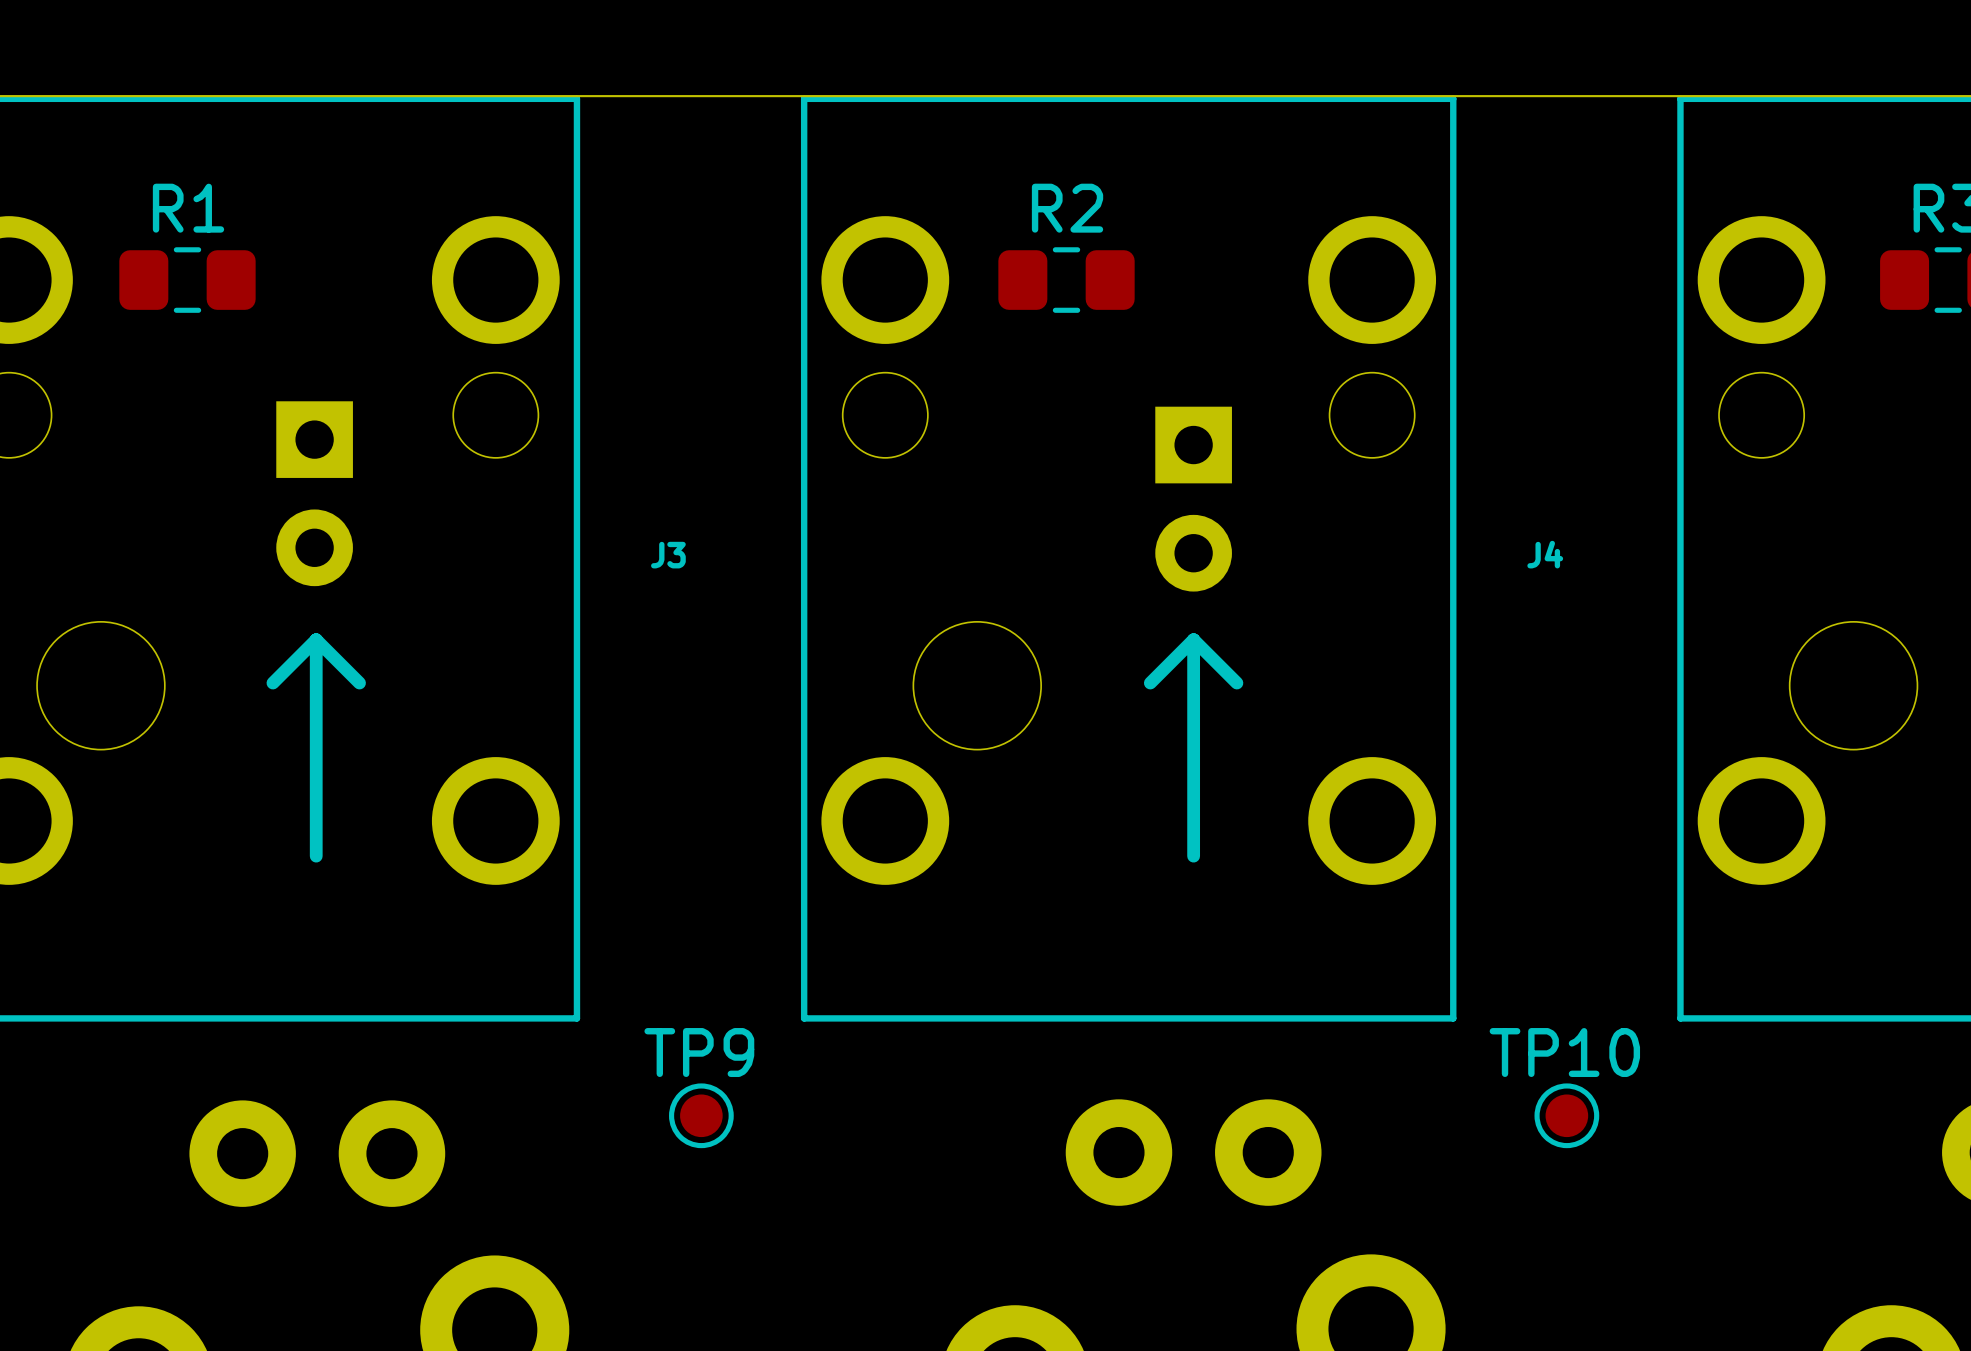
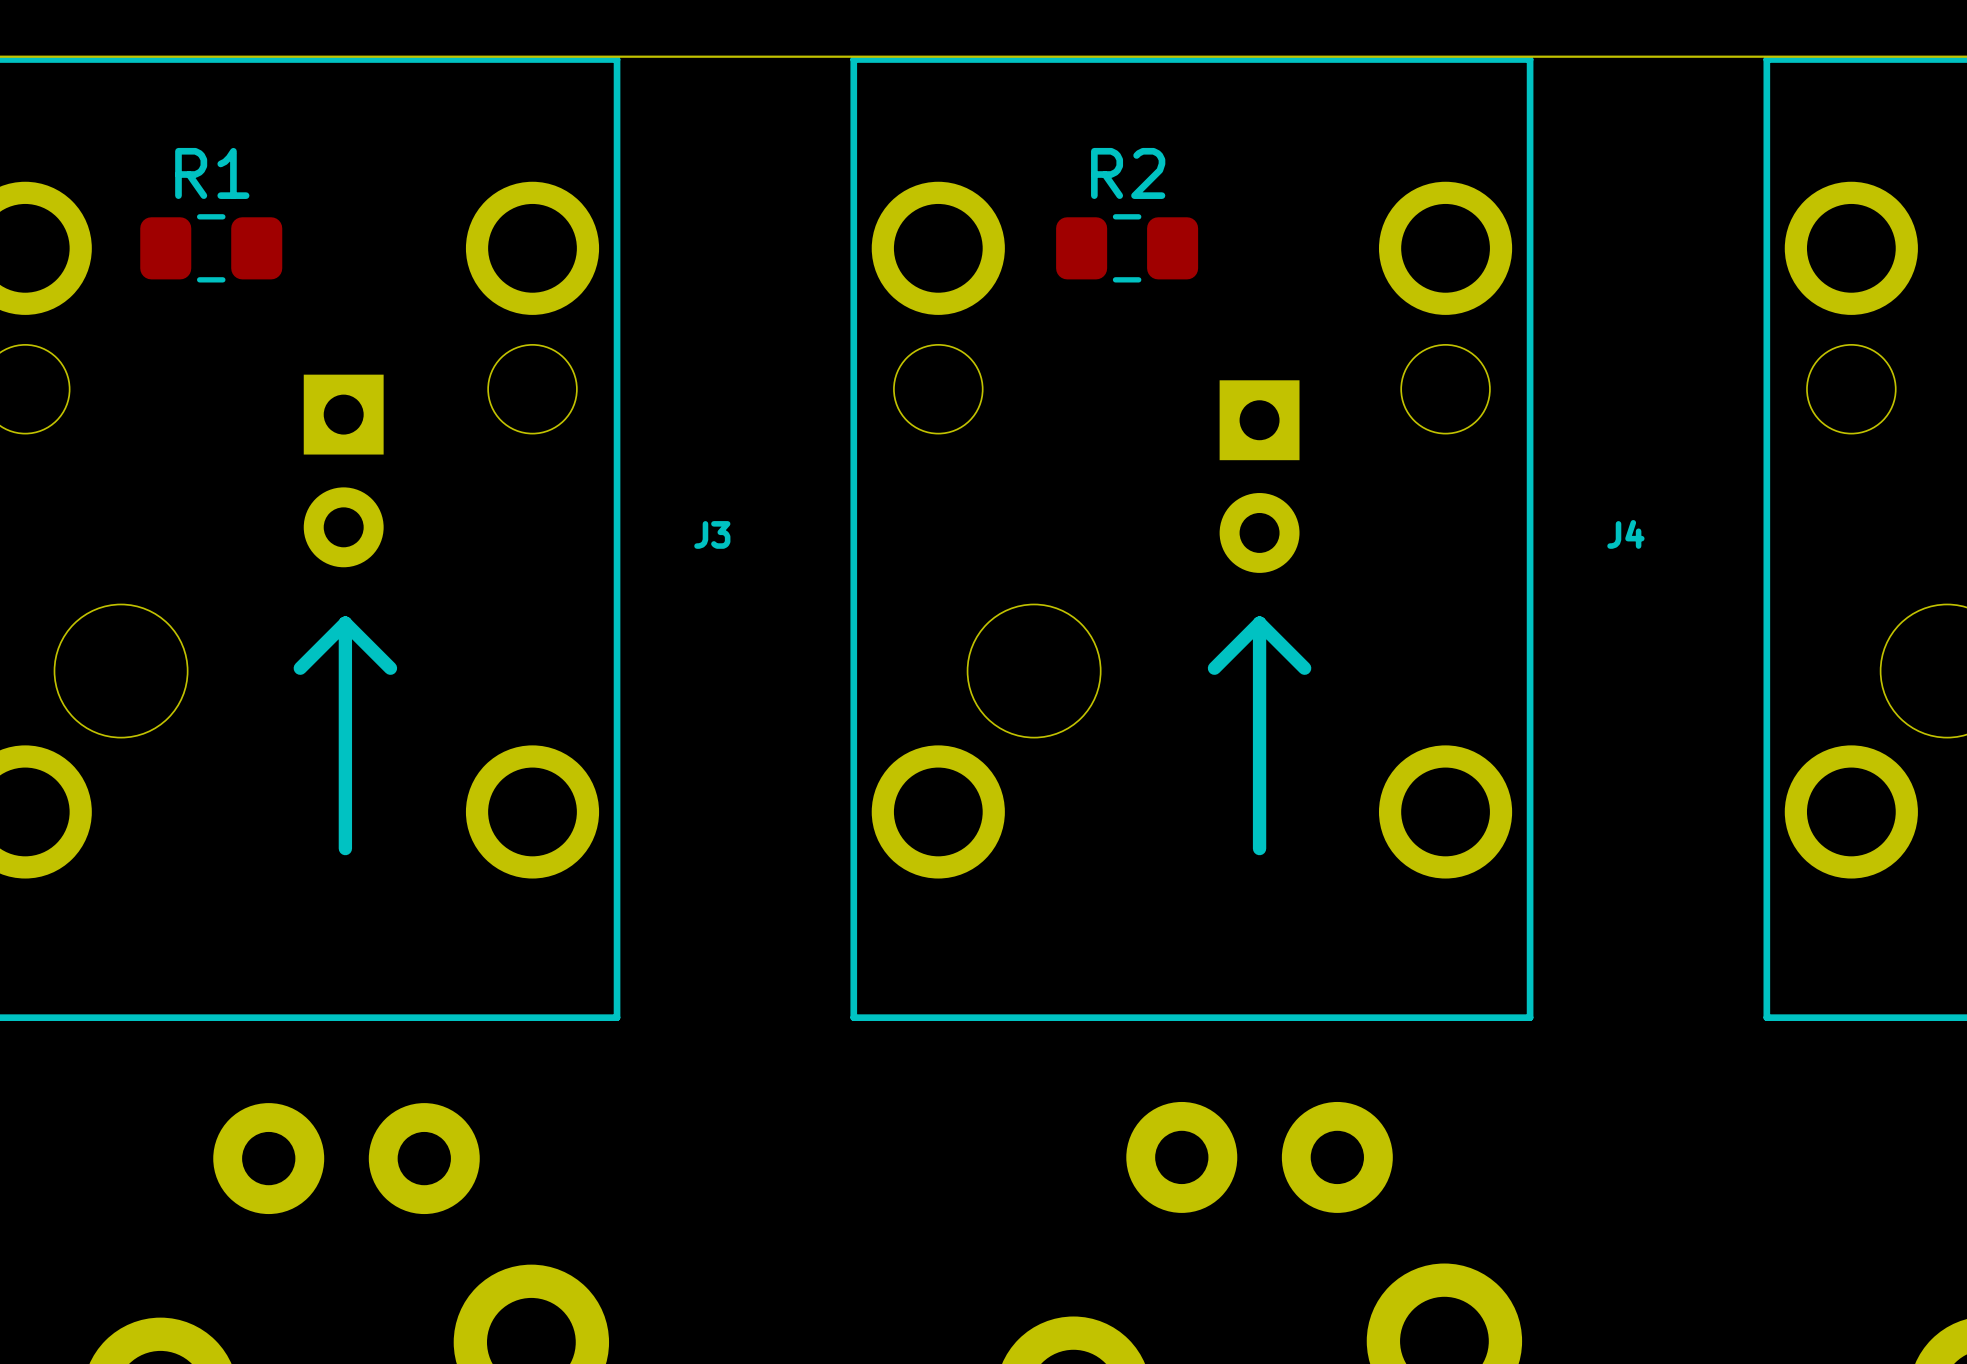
TP9: (701, 1115) -> none
TP10: (1566, 1115) -> none

